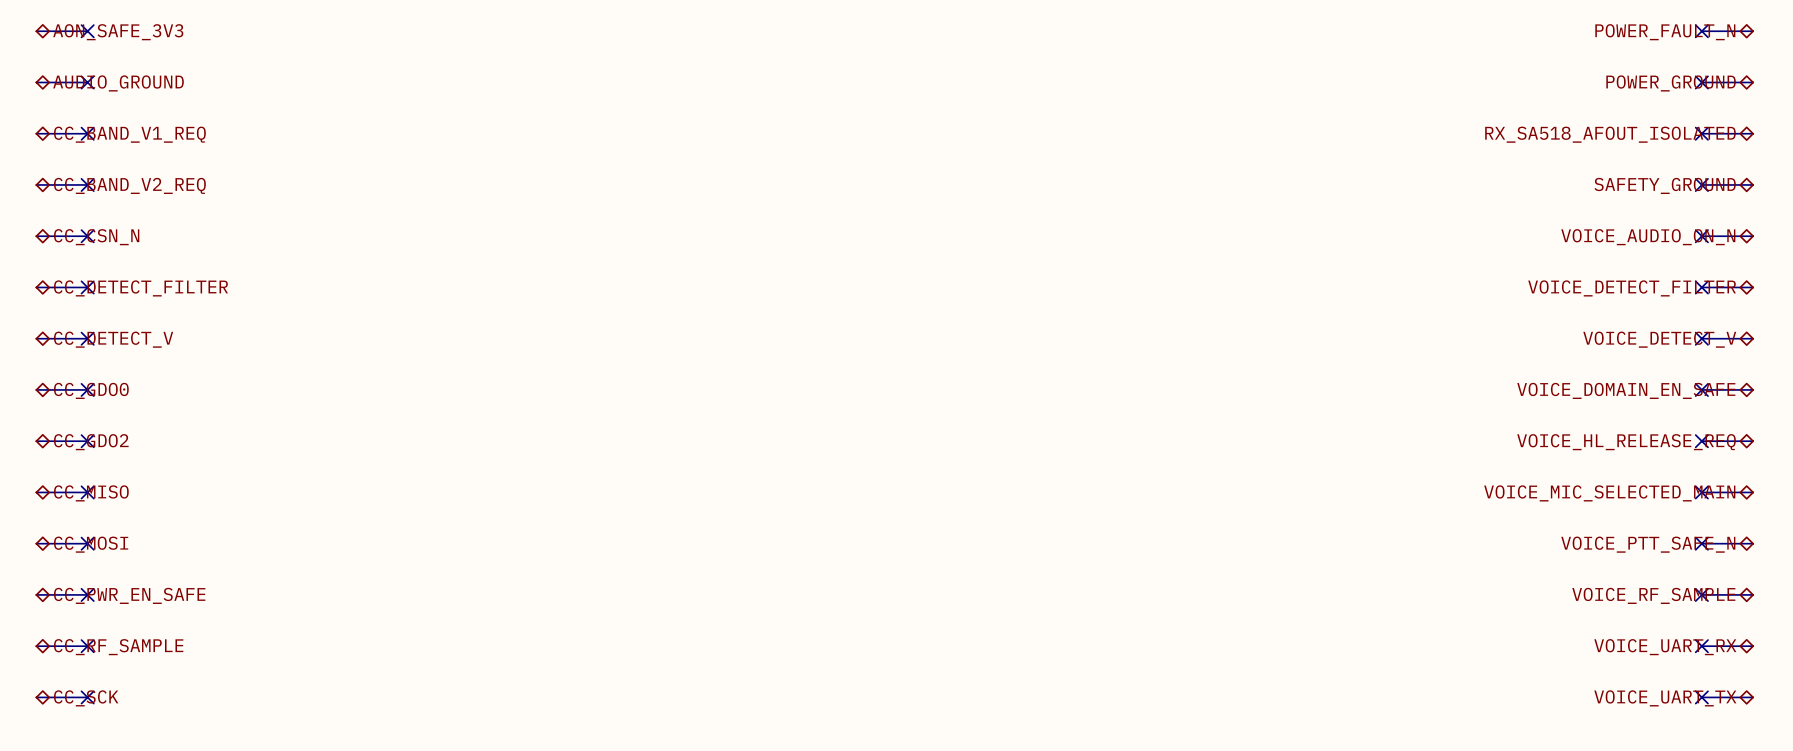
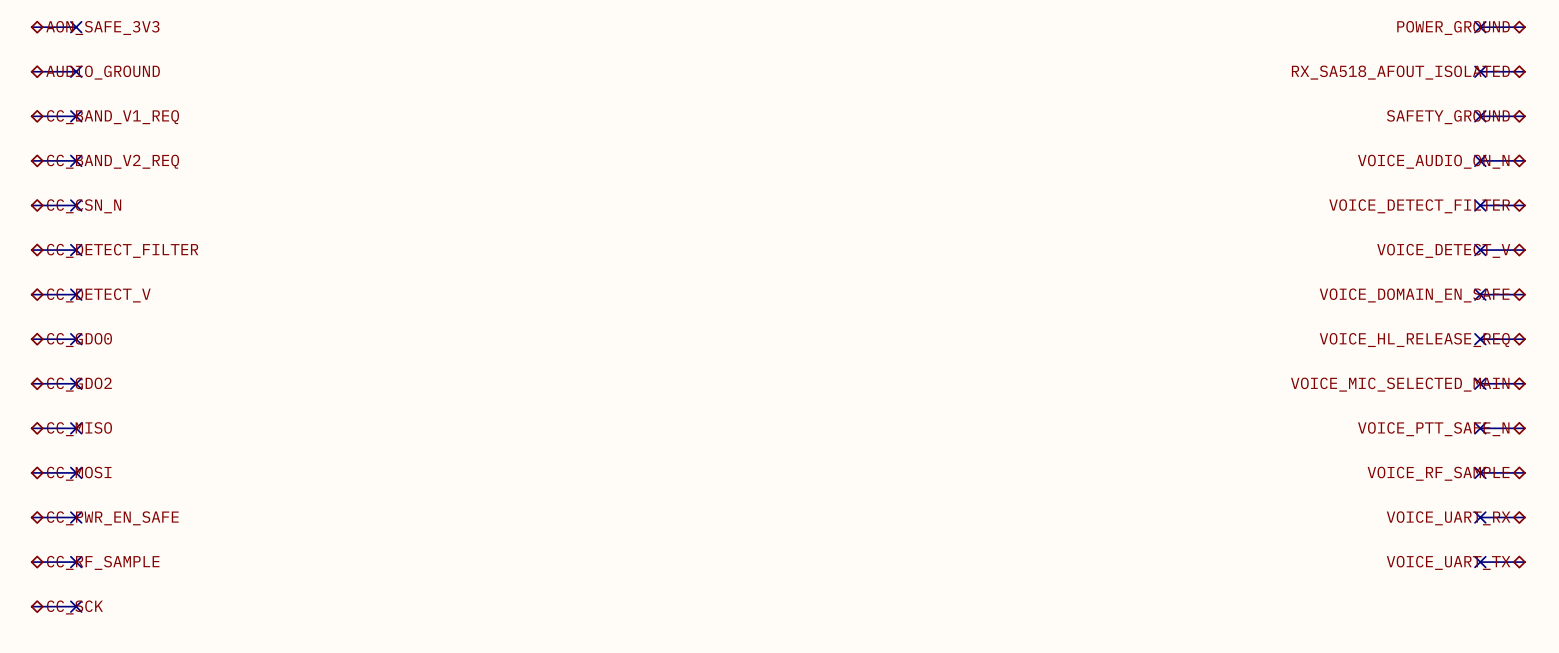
hierarchical label: POWER_FAULT_N (1665, 32) -> POWER_GROUND (1453, 28)
hierarchical label: POWER_GROUND (1671, 83) -> RX_SA518_AFOUT_ISOLATED (1400, 72)
hierarchical label: RX_SA518_AFOUT_ISOLATED (1610, 134) -> SAFETY_GROUND (1448, 117)
hierarchical label: SAFETY_GROUND (1665, 185) -> VOICE_AUDIO_ON_N (1433, 161)
hierarchical label: VOICE_AUDIO_ON_N (1648, 237) -> VOICE_DETECT_FILTER (1419, 206)
hierarchical label: VOICE_DETECT_FILTER (1632, 288) -> VOICE_DETECT_V (1443, 250)
hierarchical label: VOICE_DETECT_V (1659, 339) -> VOICE_DOMAIN_EN_SAFE (1414, 295)
hierarchical label: VOICE_DOMAIN_EN_SAFE (1626, 390) -> VOICE_HL_RELEASE_REQ (1414, 340)
hierarchical label: VOICE_HL_RELEASE_REQ (1626, 442) -> VOICE_MIC_SELECTED_MAIN (1400, 384)
hierarchical label: VOICE_MIC_SELECTED_MAIN (1609, 493) -> VOICE_PTT_SAFE_N (1433, 429)
hierarchical label: VOICE_PTT_SAFE_N (1648, 544) -> VOICE_RF_SAMPLE (1438, 473)
hierarchical label: VOICE_RF_SAMPLE (1653, 595) -> VOICE_UART_RX (1448, 518)
hierarchical label: VOICE_UART_RX (1665, 647) -> VOICE_UART_TX (1448, 562)
wire: (1701, 697) (1753, 697) -> none
no-connect mark: (1701, 697) -> none
hierarchical label: VOICE_UART_TX (1665, 698) -> none

